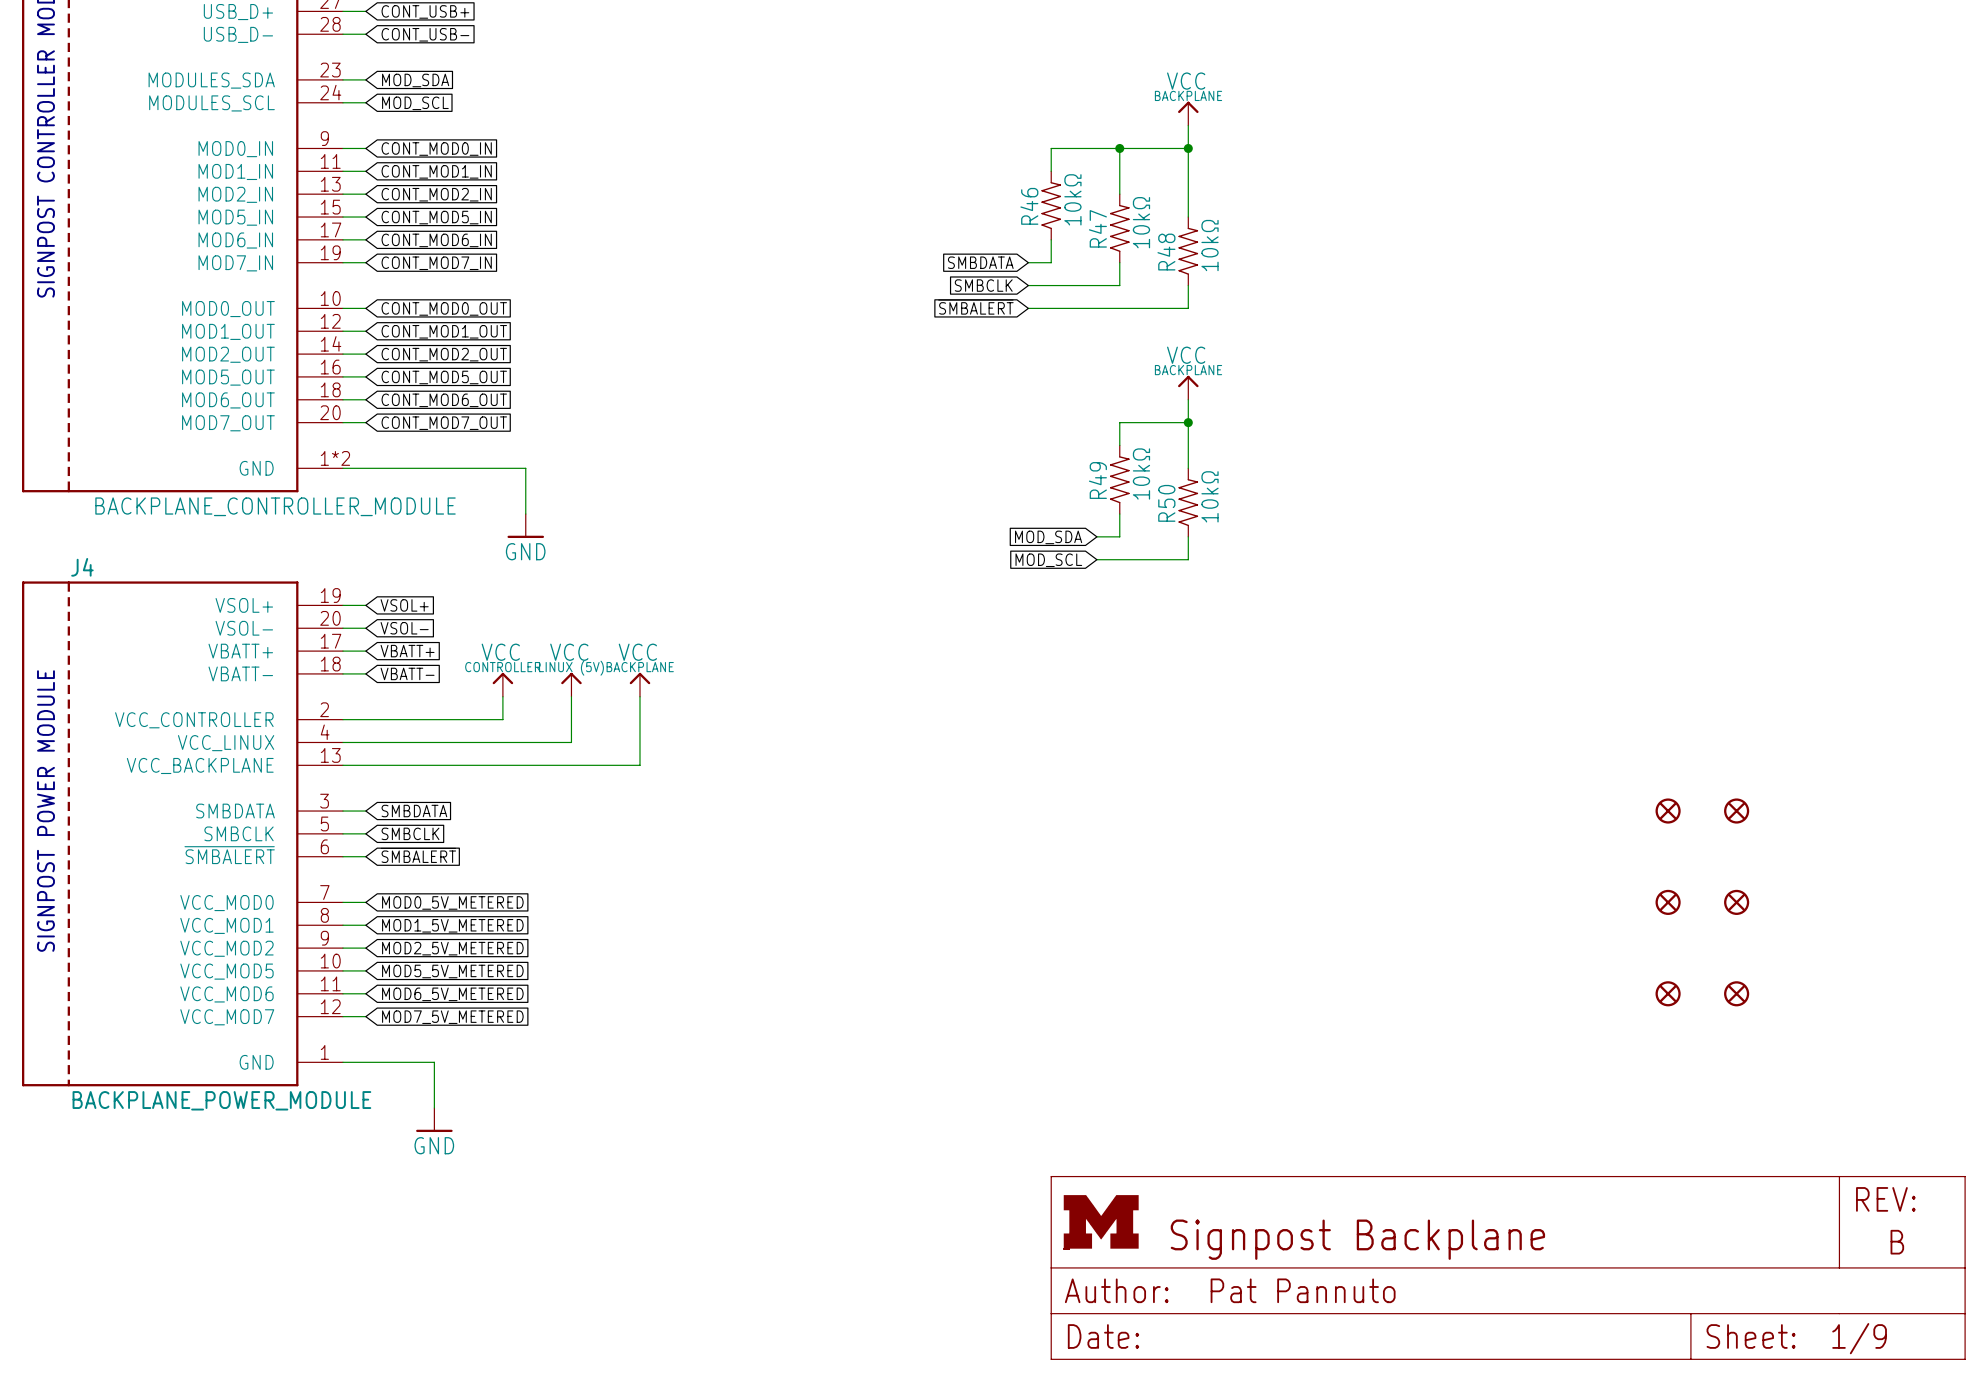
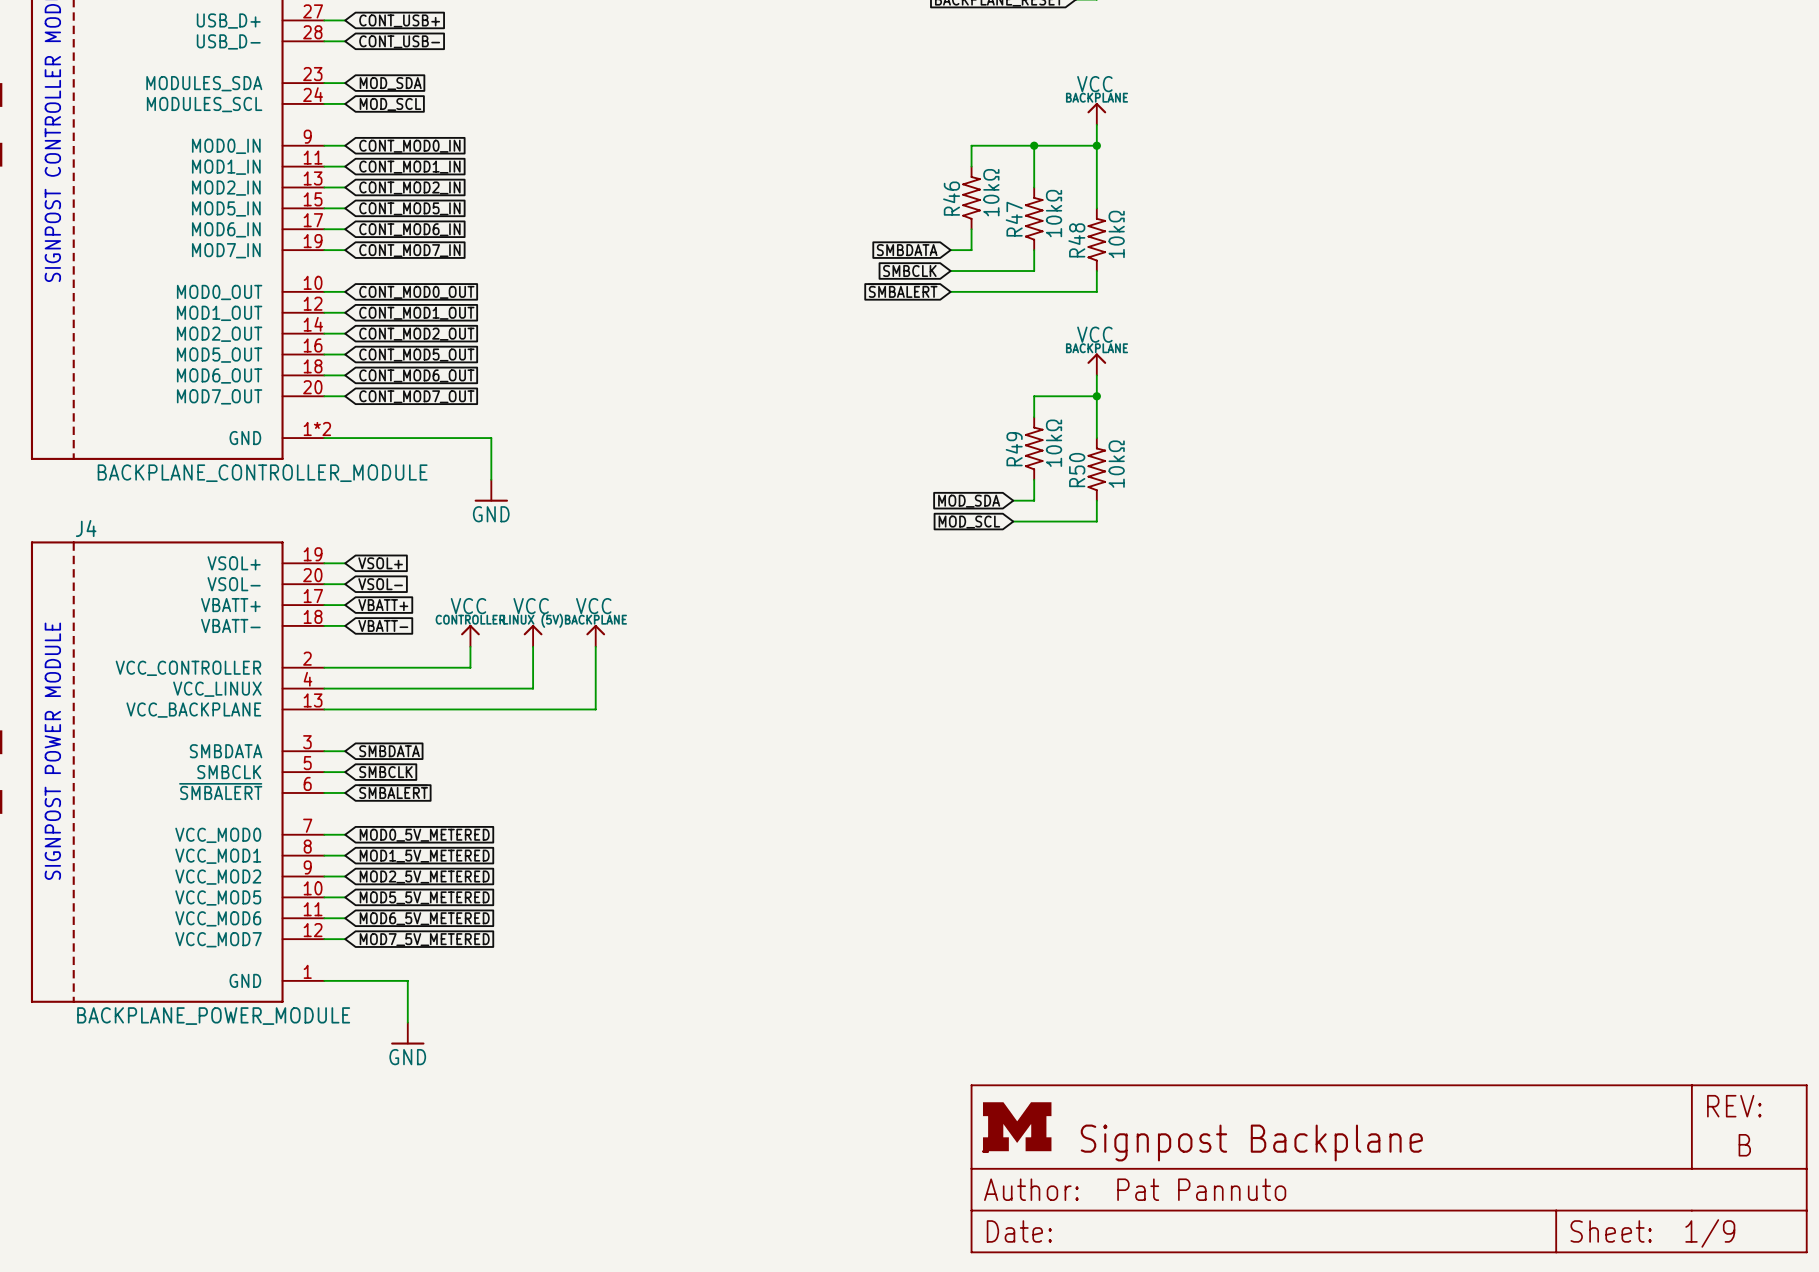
part: (1668, 811) -> none
part: (1736, 811) -> none
part: (1668, 902) -> none
part: (1736, 902) -> none
part: (1668, 993) -> none
part: (1736, 993) -> none

